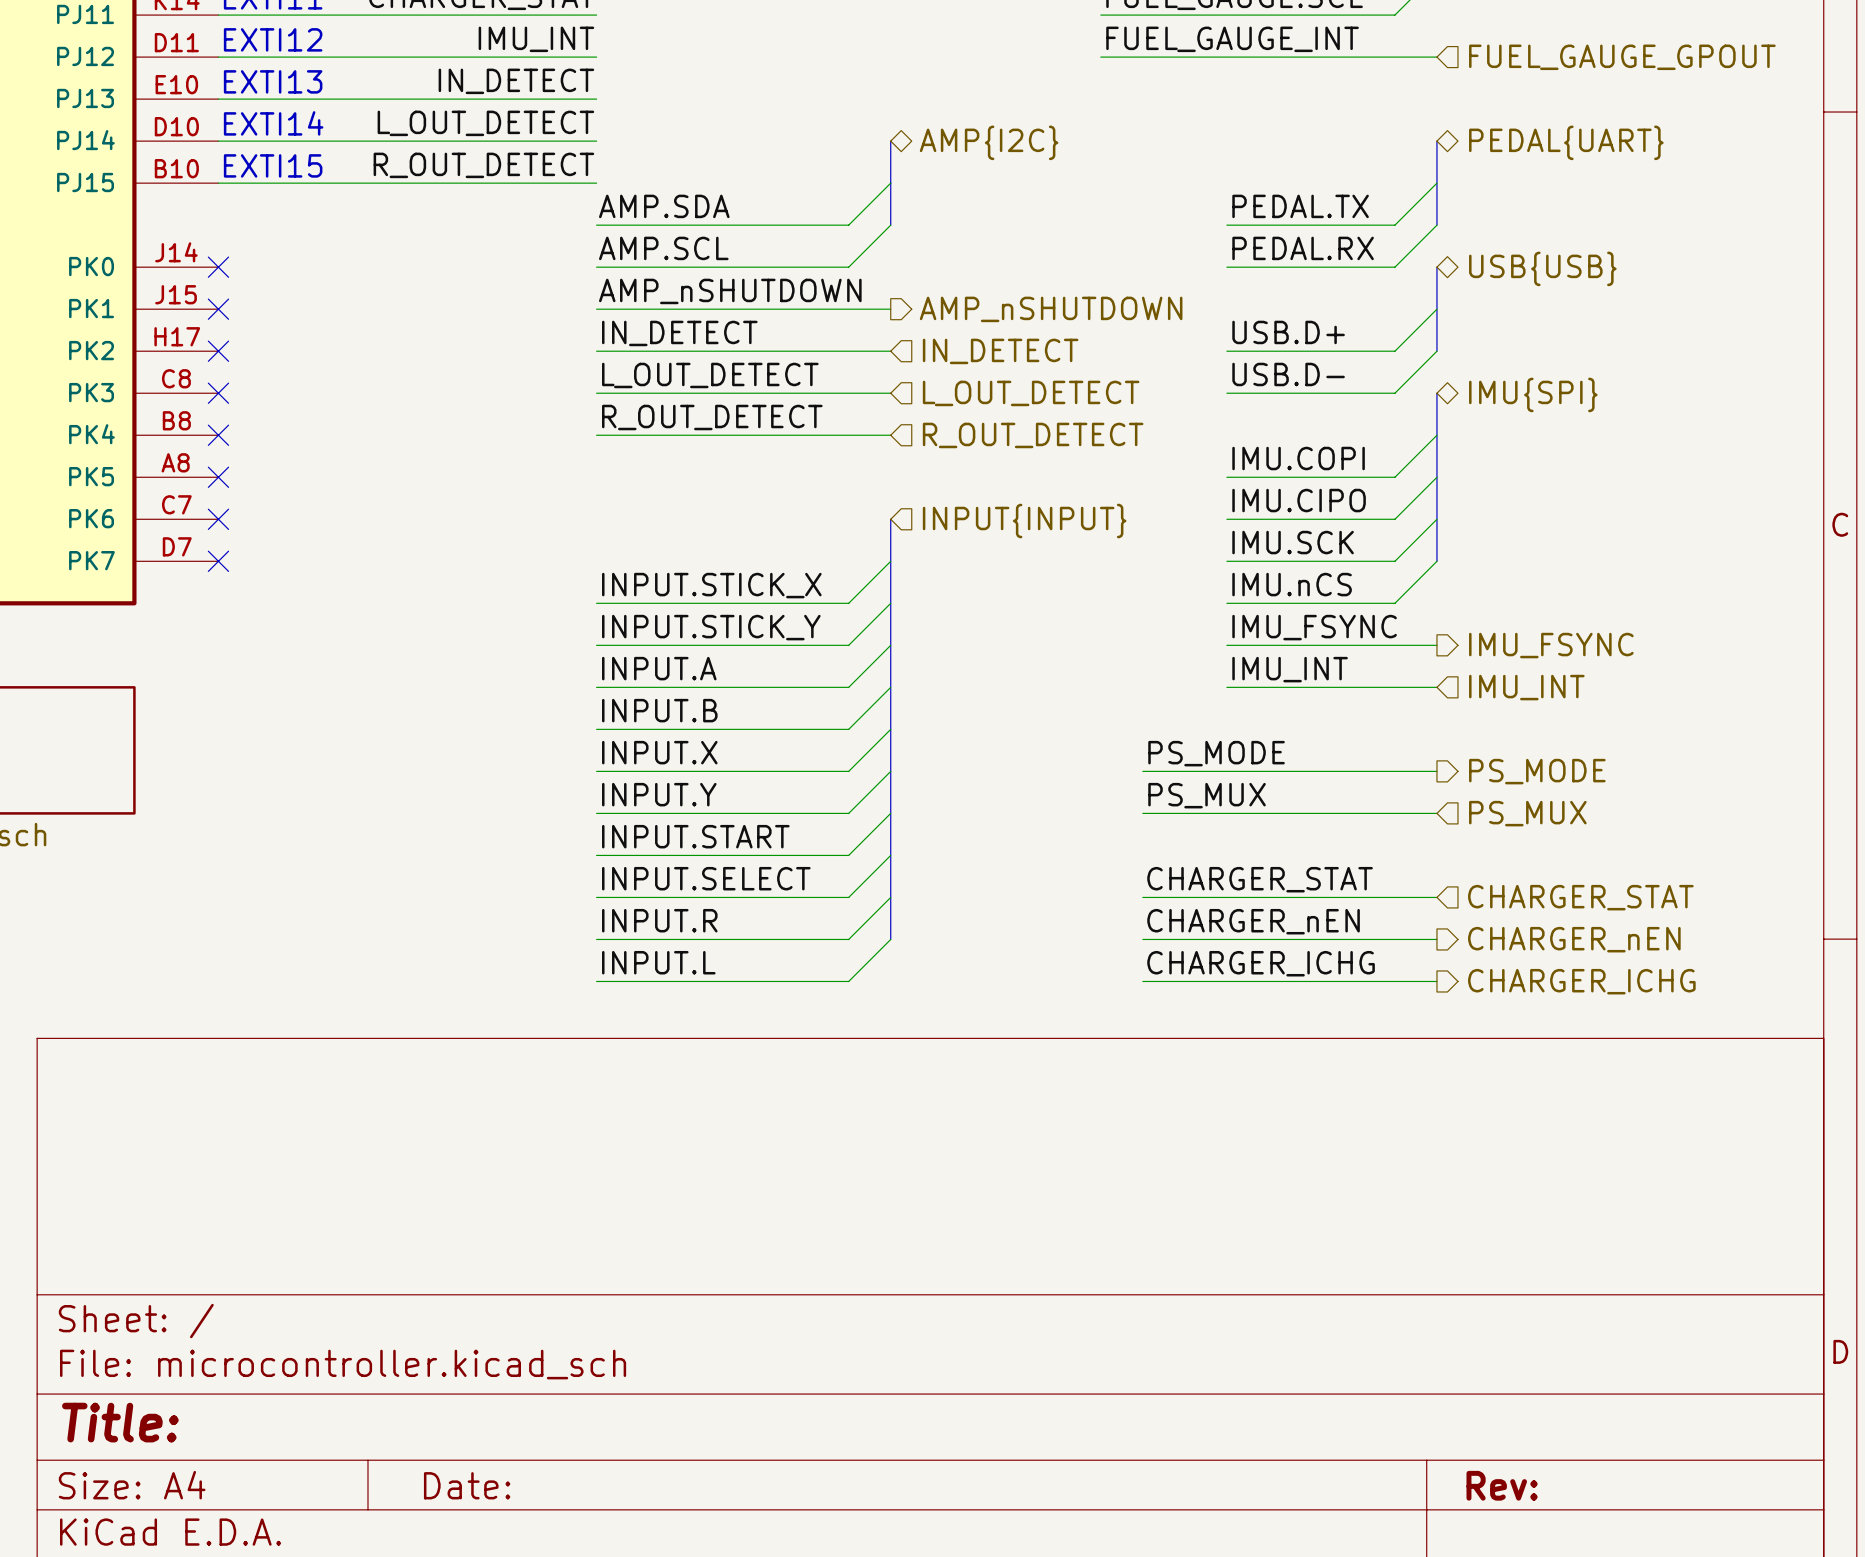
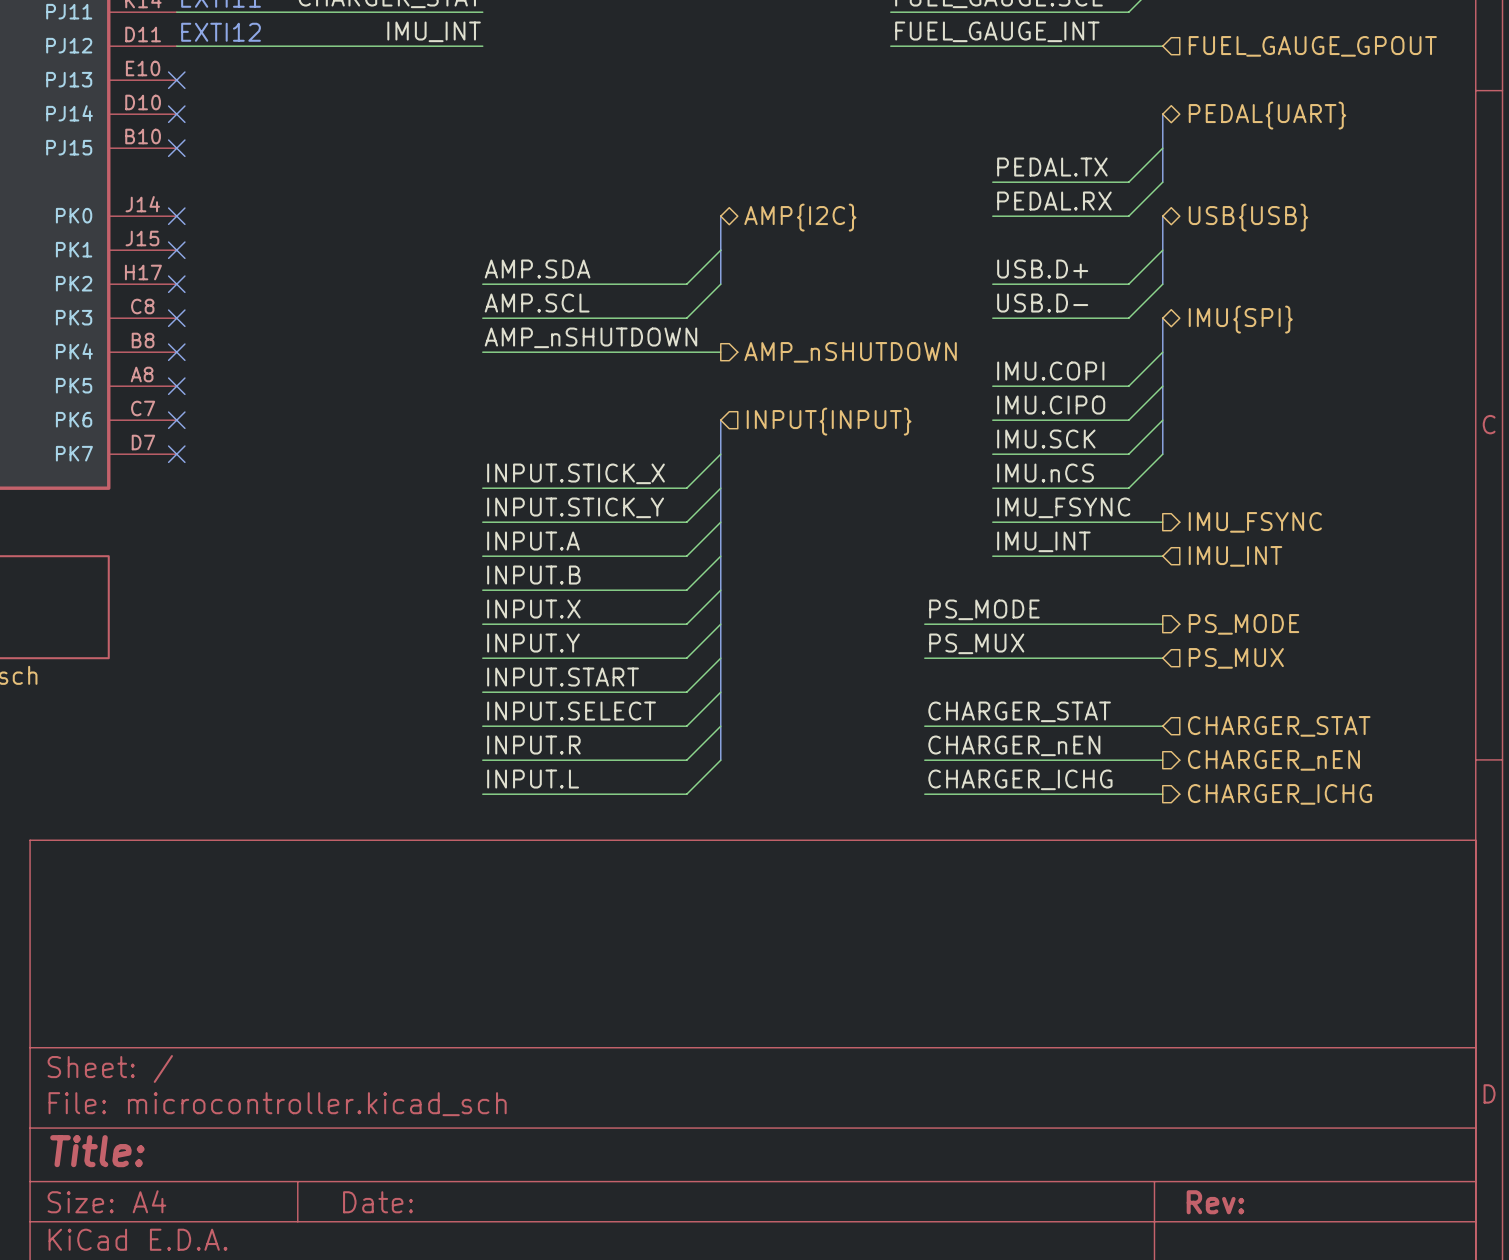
text: EXTI13 (273, 81) -> none
label: IN_DETECT (516, 81) -> none
wire: (218, 99) (596, 99) -> none
no-connect mark: none -> (176, 80)
text: EXTI14 (273, 123) -> none
label: L_OUT_DETECT (485, 123) -> none
wire: (218, 141) (596, 141) -> none
no-connect mark: none -> (176, 114)
bus: (890, 141) (890, 225) -> (720, 216) (720, 284)
hierarchical label position: AMP{I2C} (989, 142) -> AMP{I2C} (800, 217)
text: EXTI15 (273, 165) -> none
label: R_OUT_DETECT (483, 165) -> none
wire: (218, 183) (596, 183) -> none
no-connect mark: none -> (176, 148)
wire: (890, 183) (848, 225) (596, 225) -> none
label: AMP.SDA (664, 206) -> none
wire: (890, 225) (848, 267) (596, 267) -> none
label: AMP.SCL (663, 248) -> none
label: AMP_nSHUTDOWN (730, 291) -> none
wire: (596, 309) (890, 309) -> none
hierarchical label: AMP_nSHUTDOWN (1051, 309) -> none
label: IN_DETECT (679, 333) -> AMP.SDA (537, 269)
wire: (848, 351) (890, 351) -> (686, 284) (720, 250)
hierarchical label: IN_DETECT (1000, 351) -> none
label: L_OUT_DETECT (710, 375) -> AMP.SCL (537, 303)
wire: (848, 393) (890, 393) -> (686, 318) (720, 284)
hierarchical label: L_OUT_DETECT (1031, 393) -> none
label: R_OUT_DETECT (712, 417) -> AMP_nSHUTDOWN (590, 337)
hierarchical label shape: input (1033, 435) -> output (850, 352)
hierarchical label: R_OUT_DETECT (1033, 435) -> AMP_nSHUTDOWN (850, 352)

